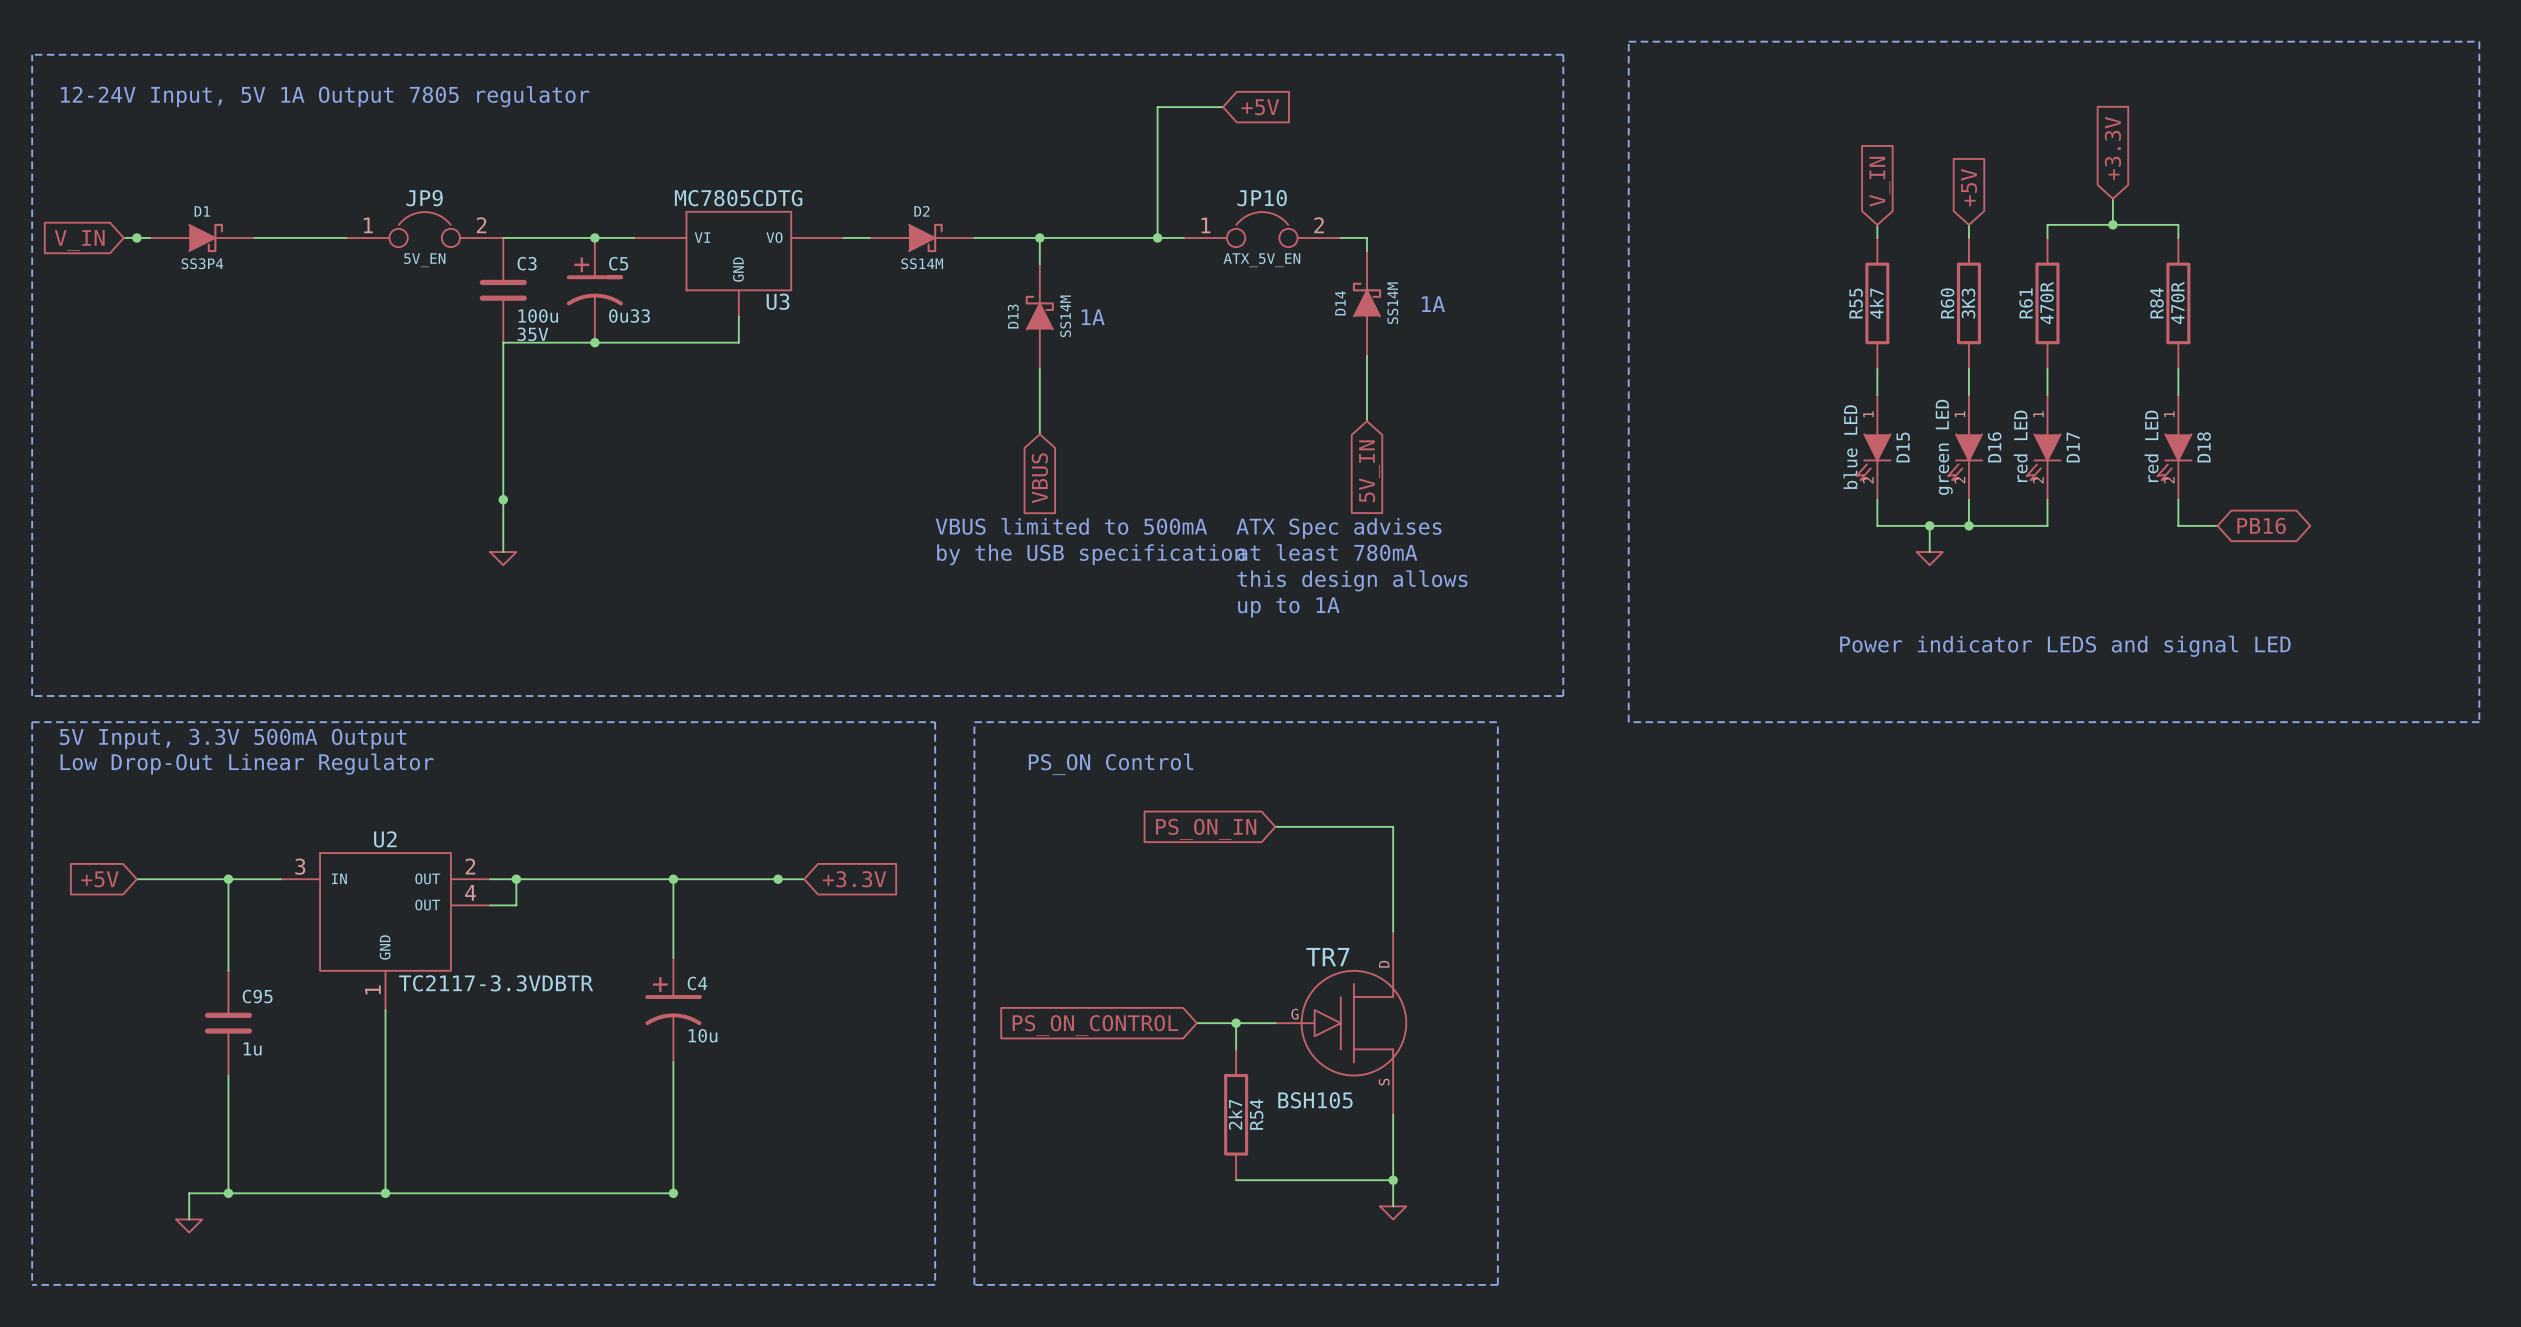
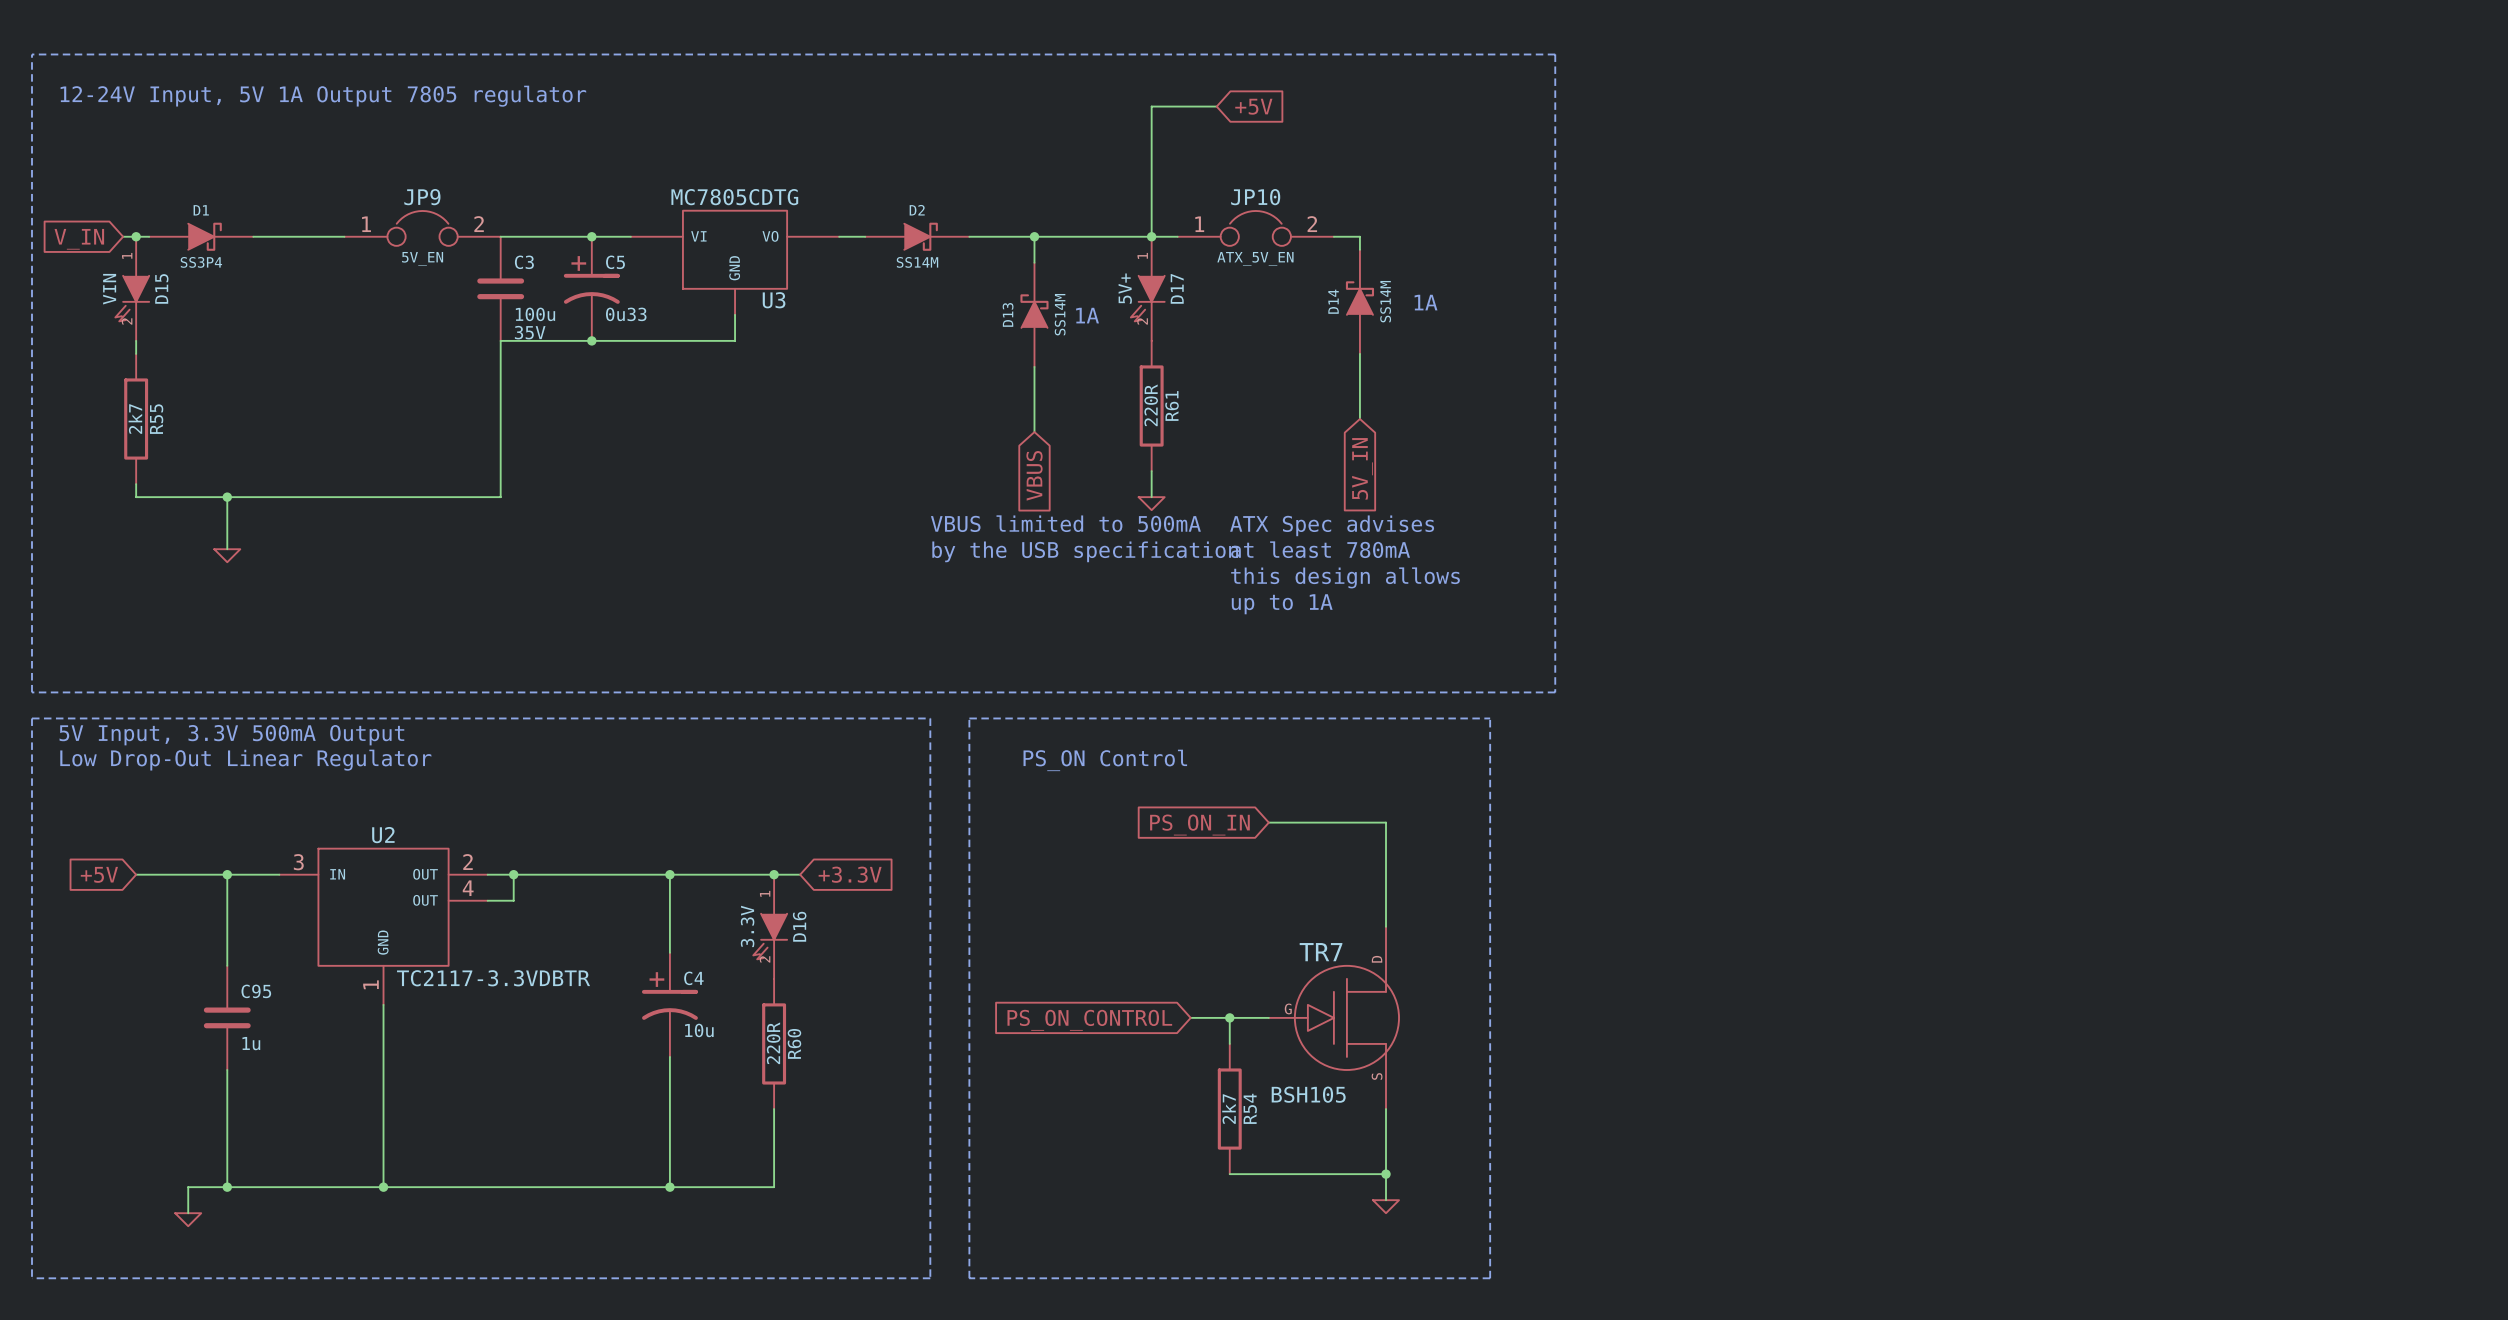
line: (1628, 41) (2479, 41) (2479, 722) (1628, 722) (1628, 41) -> none
global label: +3.3V (2112, 148) -> none
global label: V_IN (1879, 181) -> none
global label: +5V (1969, 187) -> none
wire: (2112, 198) (2112, 224) -> none
wire: (1877, 224) (1877, 237) -> none
wire: (1968, 224) (1968, 237) -> none
junction: (2112, 224) -> none
wire: (2047, 237) (2047, 224) (2178, 224) (2178, 237) -> none
R61 value: 470R (2047, 302) -> 220R (1151, 405)
R55 name position: R55 (1856, 303) -> R55 (156, 419)
R55 value: 4k7 (1876, 303) -> 2k7 (135, 419)
R55 position: (1877, 303) -> (136, 419)
R60 name position: R60 (1947, 303) -> R60 (794, 1043)
R60 position: (1968, 303) -> (774, 1043)
R60 value: 3K3 (1968, 303) -> 220R (773, 1043)
R61 name position: R61 (2026, 303) -> R61 (1172, 405)
R61 position: (2047, 303) -> (1151, 406)
R84: 470R (2178, 303) -> none
wire: none -> (136, 340) (136, 353)
wire: (1877, 368) (1877, 395) -> none
wire: (1968, 368) (1968, 395) -> none
wire: (2047, 368) (2047, 395) -> none
wire: (2178, 368) (2178, 395) -> none
D17 value: red LED (2020, 446) -> 5V+ (1125, 288)
D15 value: blue LED (1850, 447) -> VIN (109, 289)
D15 position: (1873, 447) -> (132, 288)
D16 value: green LED (1944, 447) -> 3.3V (747, 926)
D16 position: (1965, 447) -> (770, 926)
D17 position: (2043, 447) -> (1147, 288)
D18: red LED (2174, 447) -> none
wire: none -> (1151, 471) (1151, 497)
wire: none -> (227, 497) (227, 549)
junction: none -> (227, 497)
wire: (503, 499) (503, 552) -> (500, 497) (136, 497) (136, 484)
junction: (503, 499) -> none
wire: (1877, 499) (1877, 525) (2047, 525) (2047, 499) -> none
wire: (1968, 499) (1968, 525) -> none
wire: (2178, 499) (2178, 525) (2217, 525) -> none
power symbol: none -> (1151, 503)
wire: (1929, 525) (1929, 552) -> none
junction: (1929, 525) -> none
junction: (1968, 525) -> none
global label: PB16 (2261, 525) -> none
power symbol: none -> (227, 555)
power symbol: (503, 558) -> none
power symbol: (1929, 558) -> none
text: Power indicator LEDS and signal LED (2065, 646) -> none
wire: none -> (774, 1109) (774, 1187) (669, 1187)

